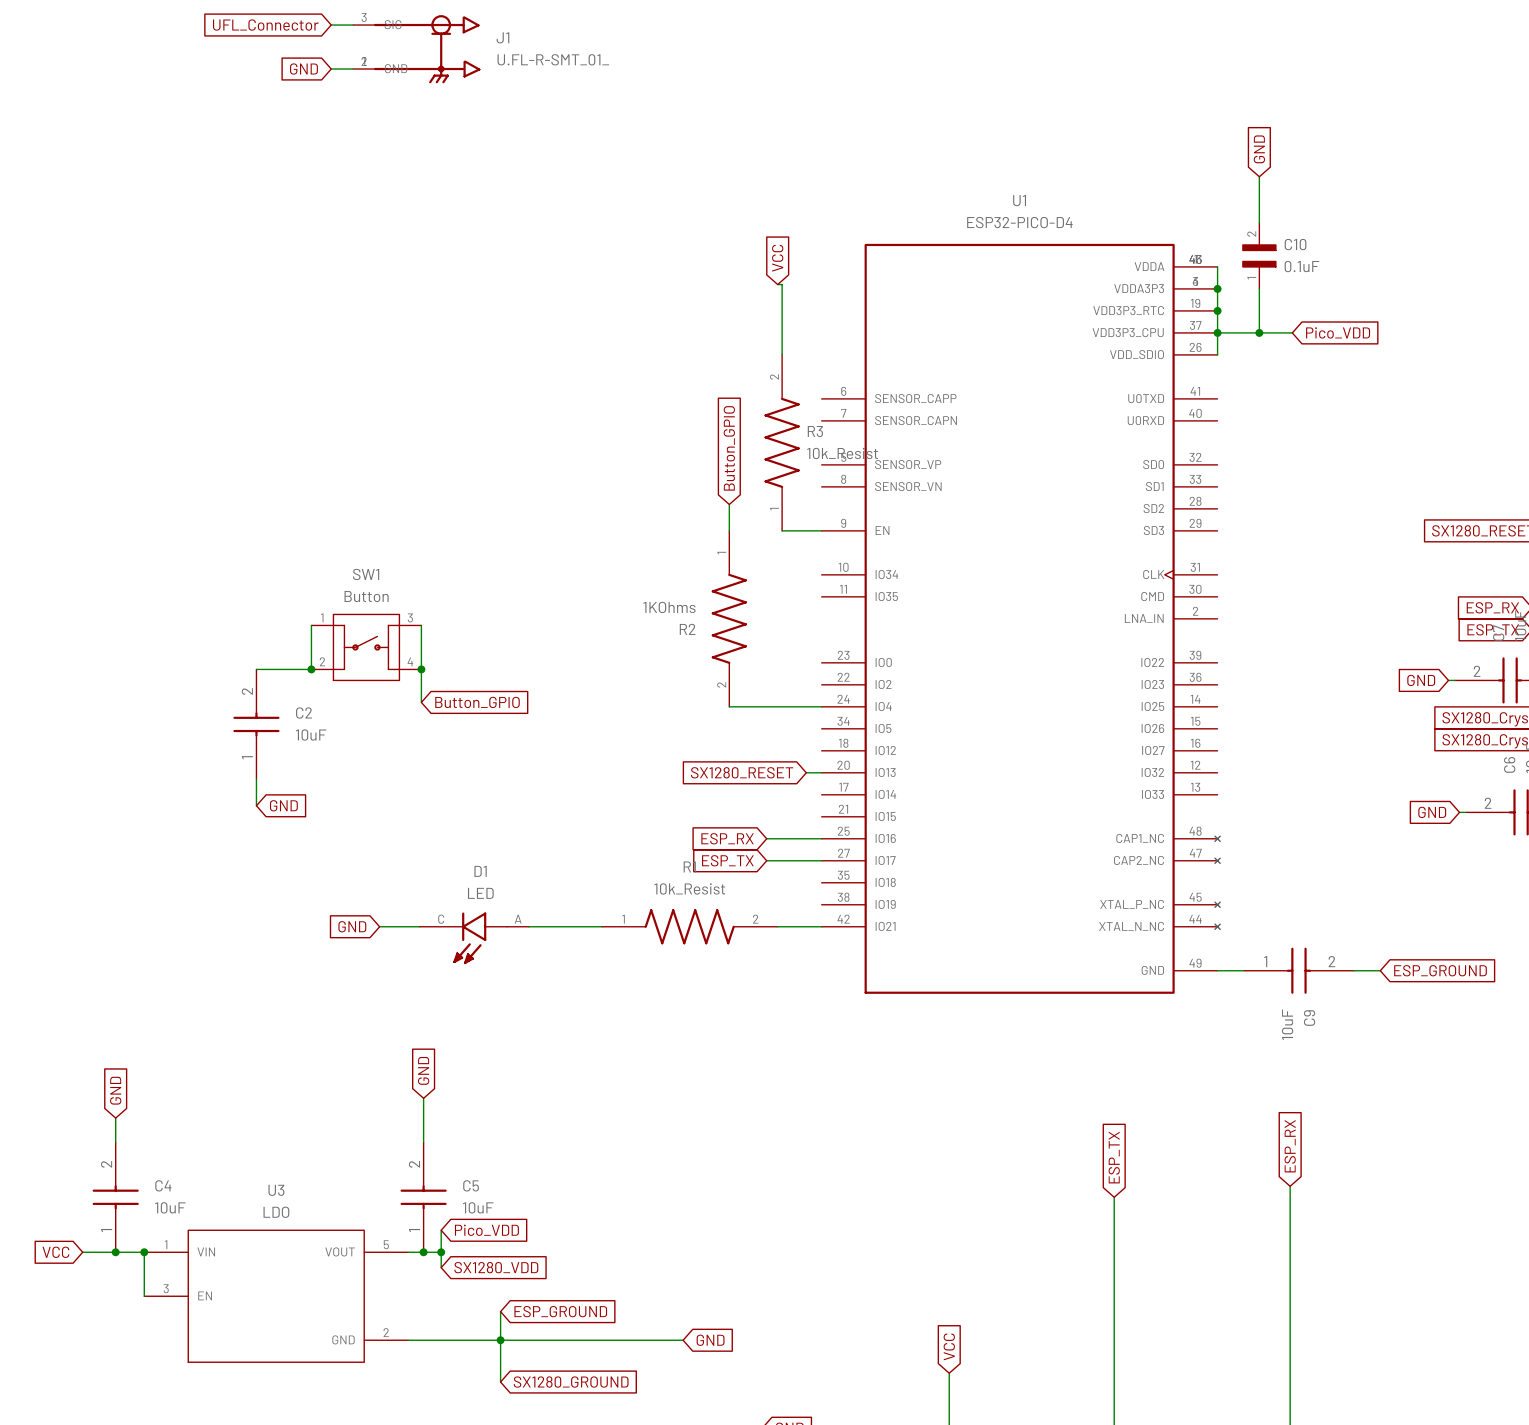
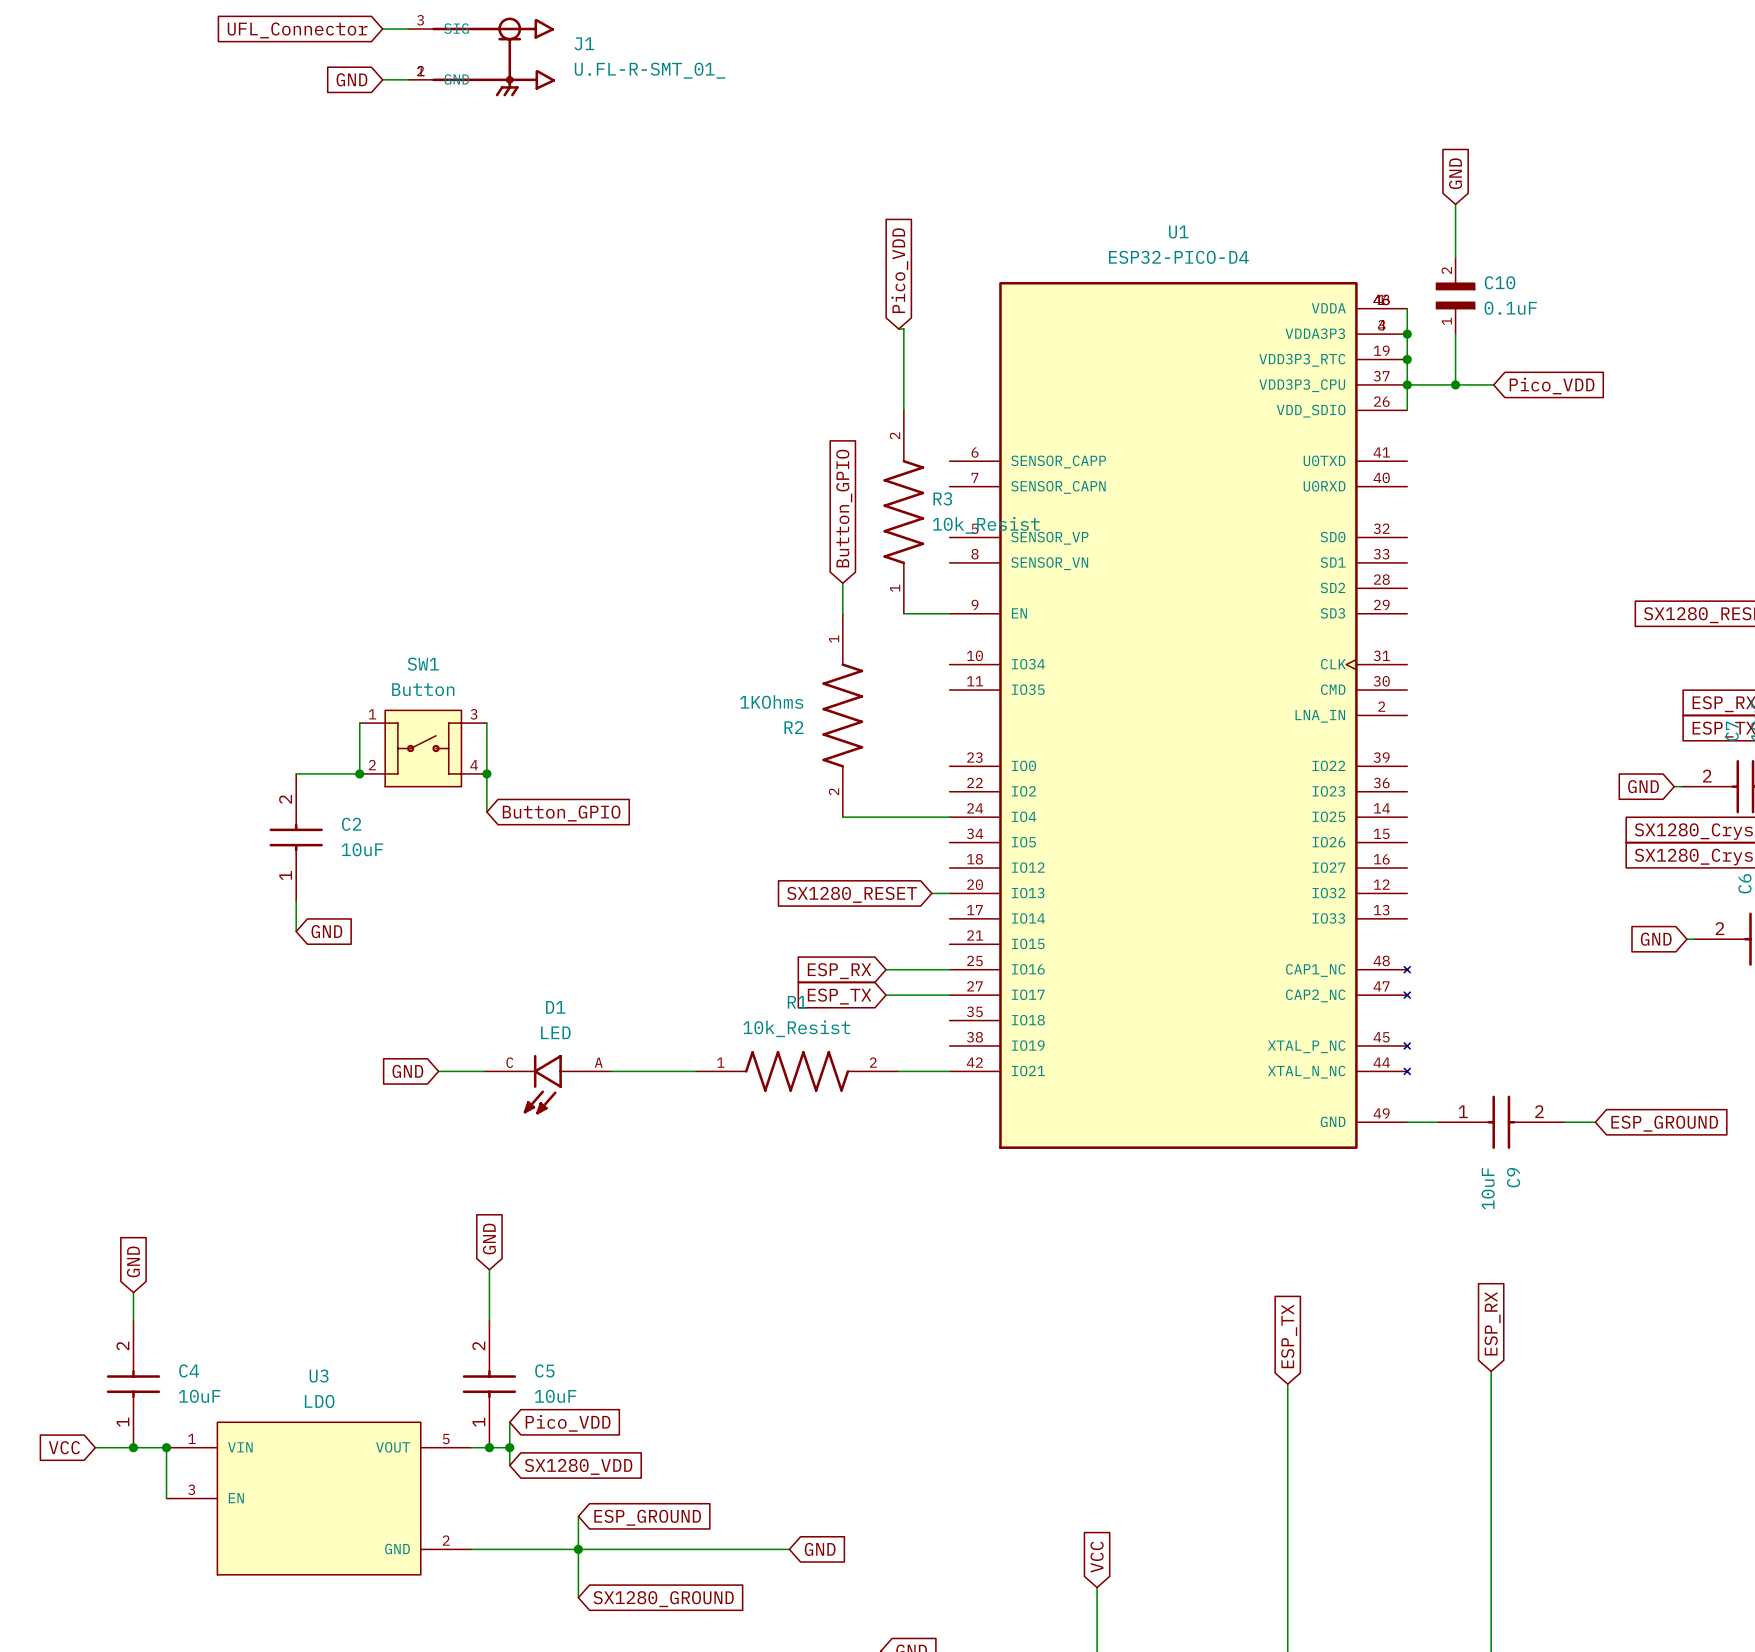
global label: VCC (777, 258) -> Pico_VDD (899, 270)

